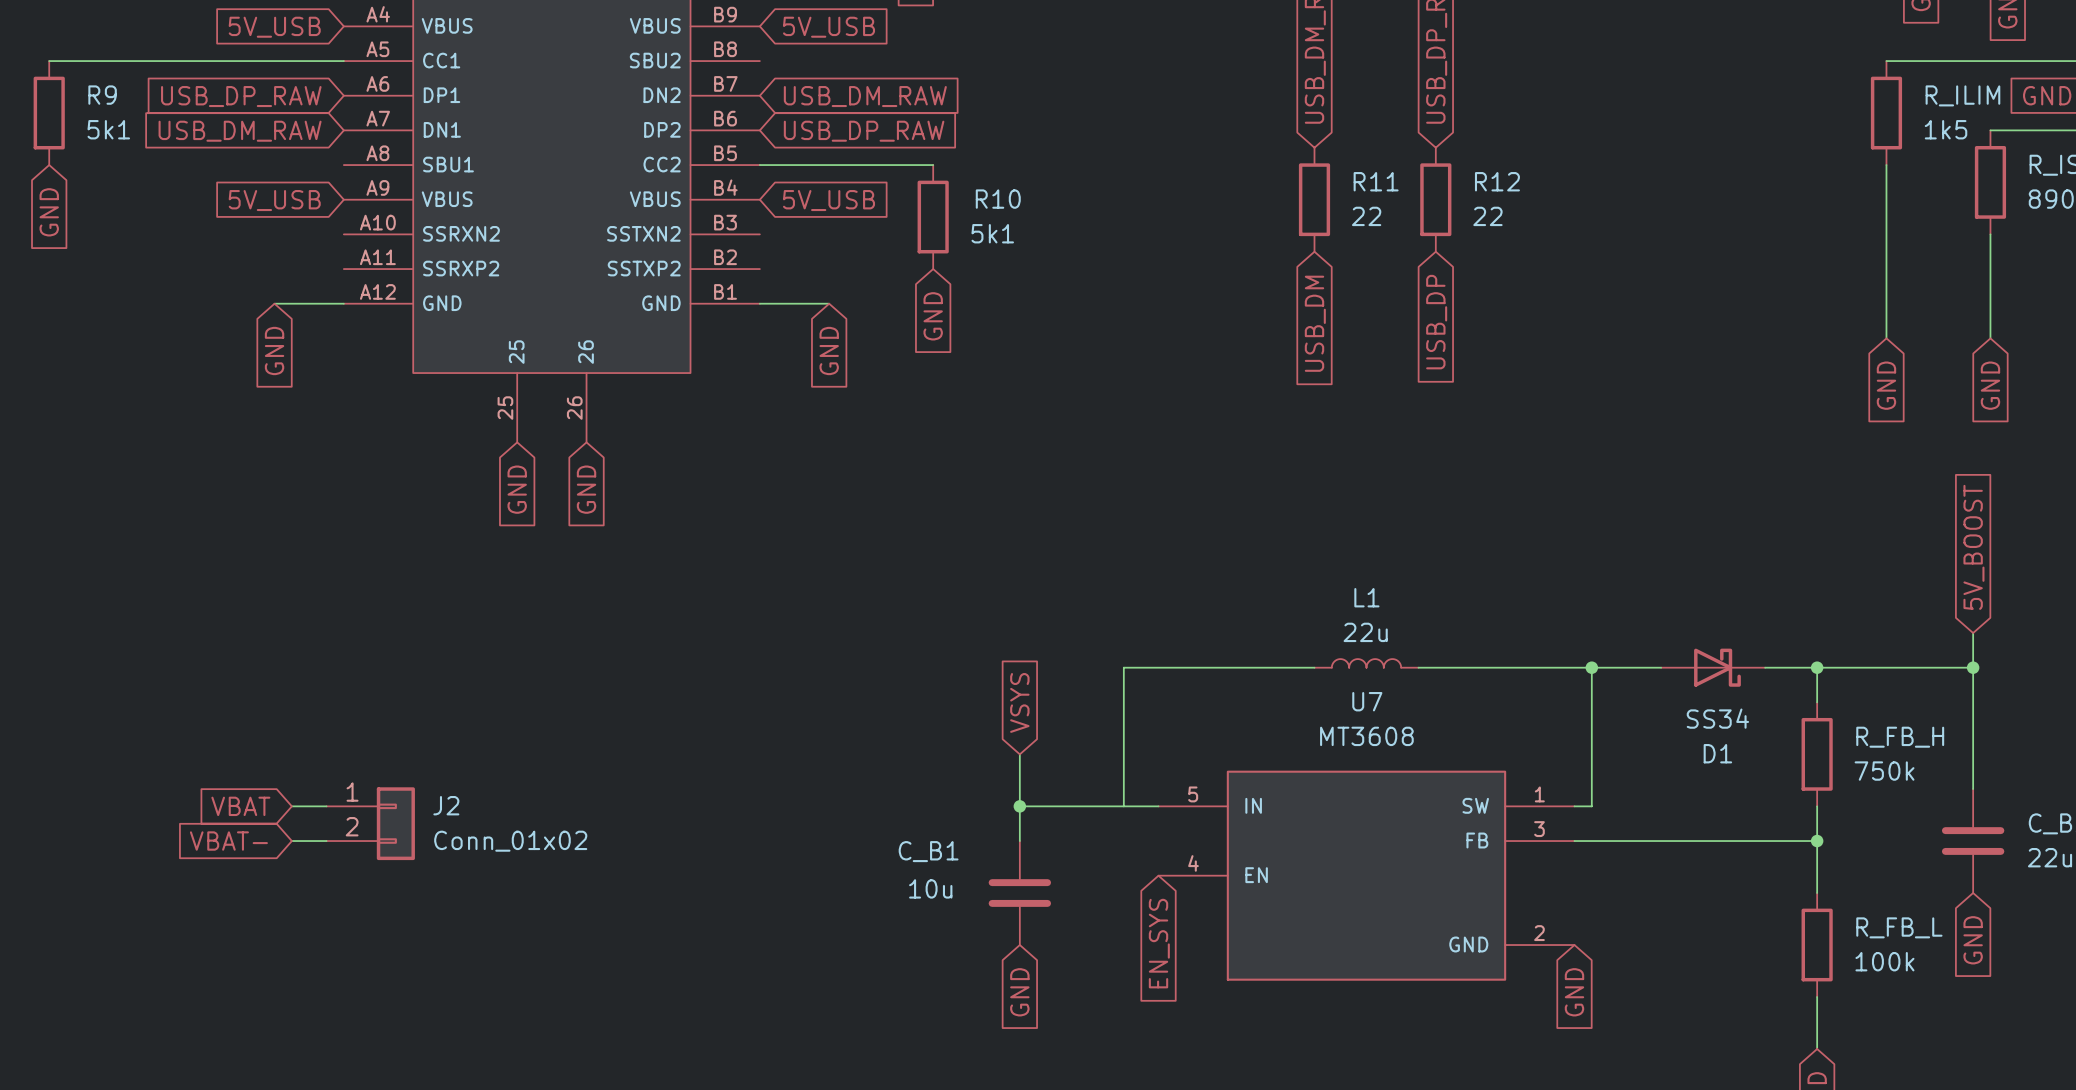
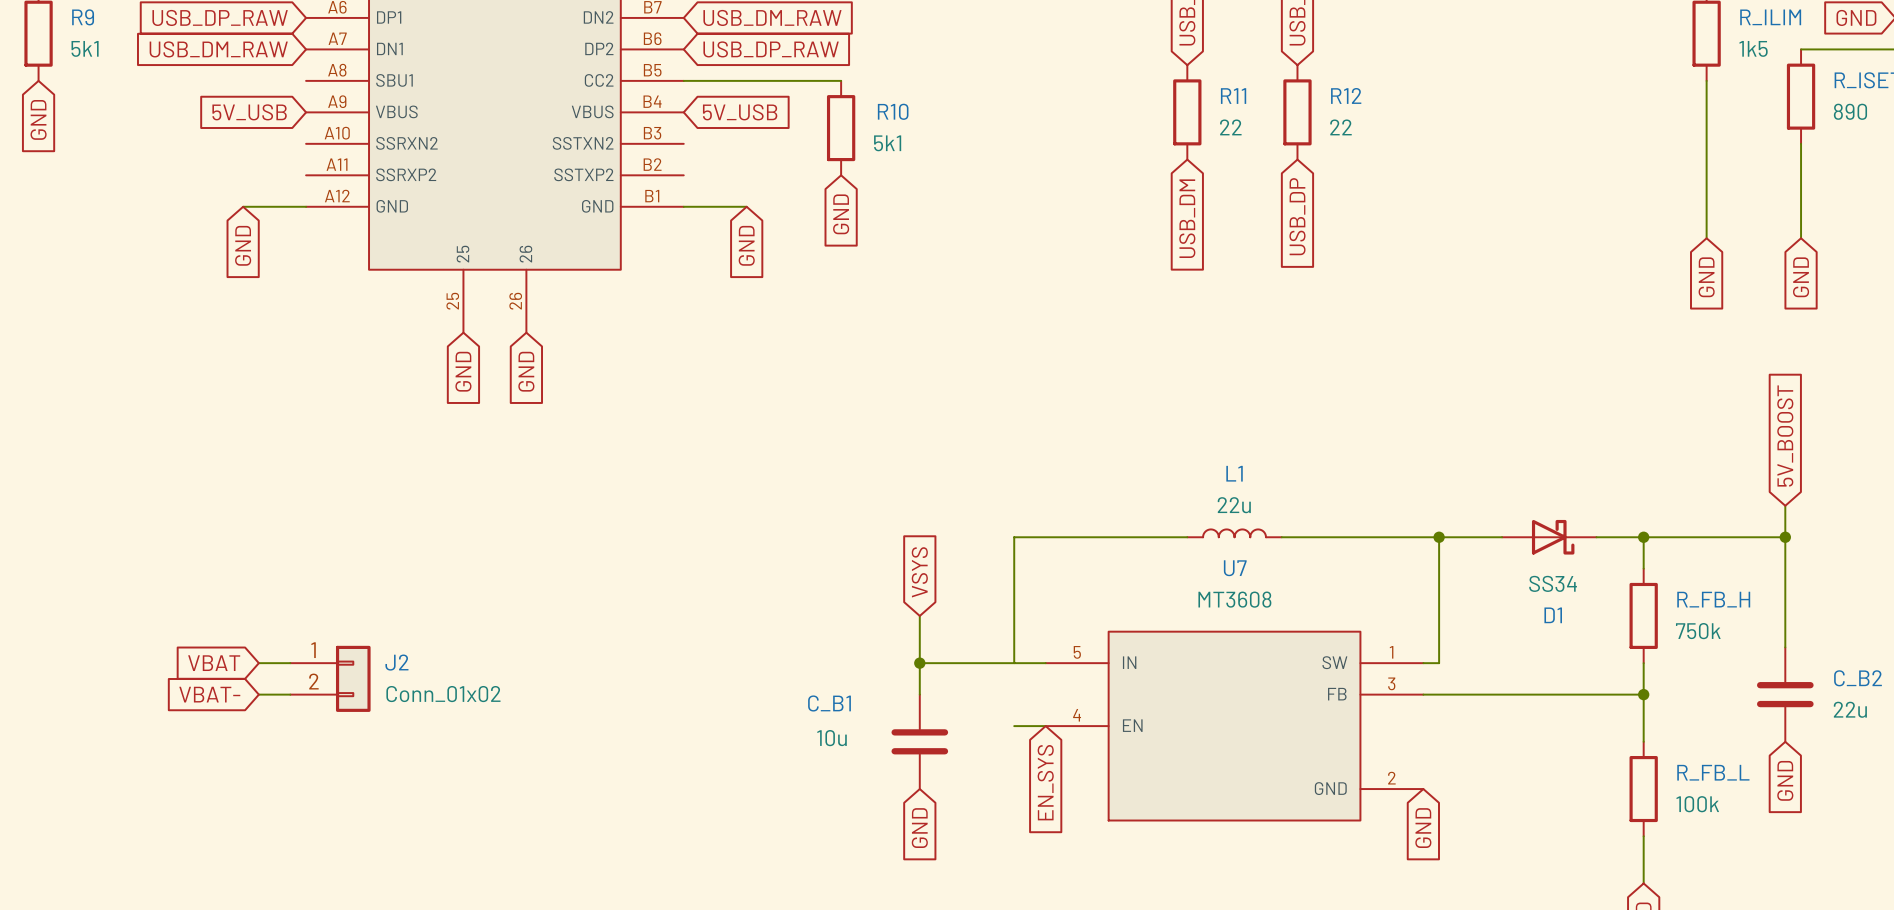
wire: none -> (1014, 726) (1045, 726)

